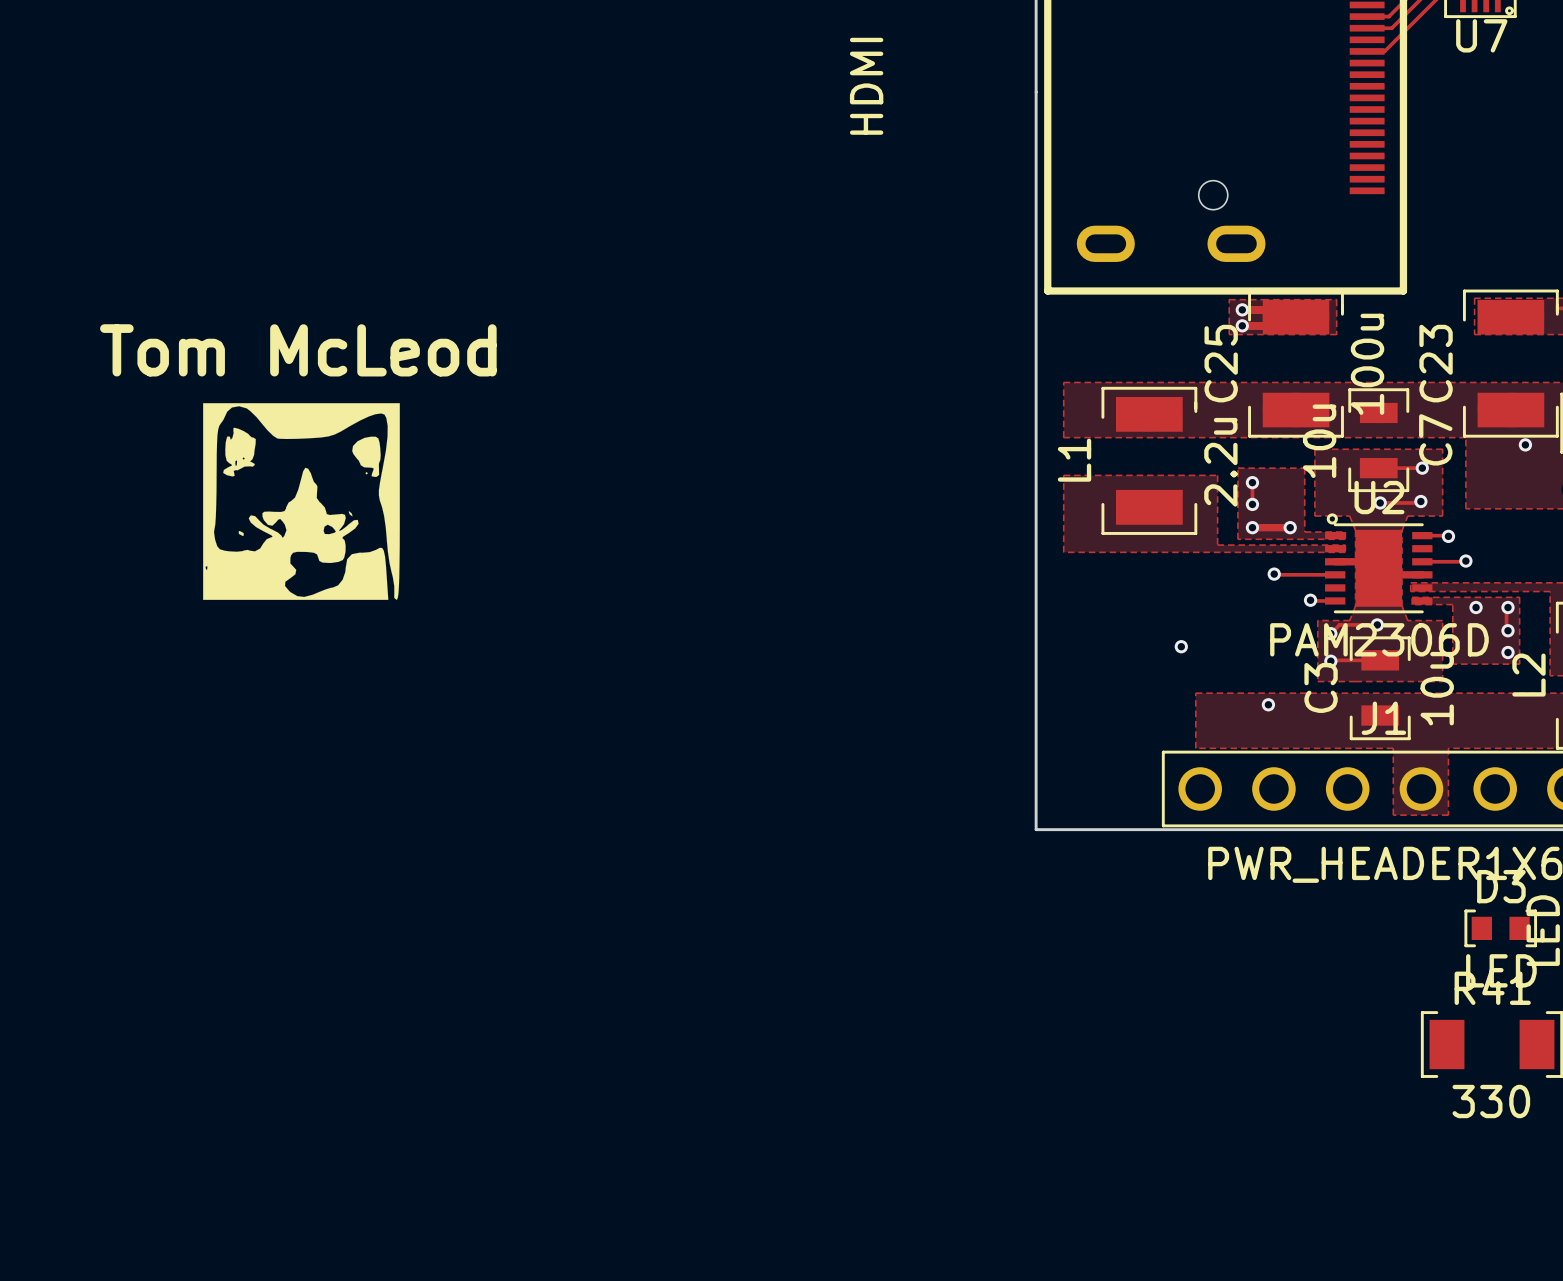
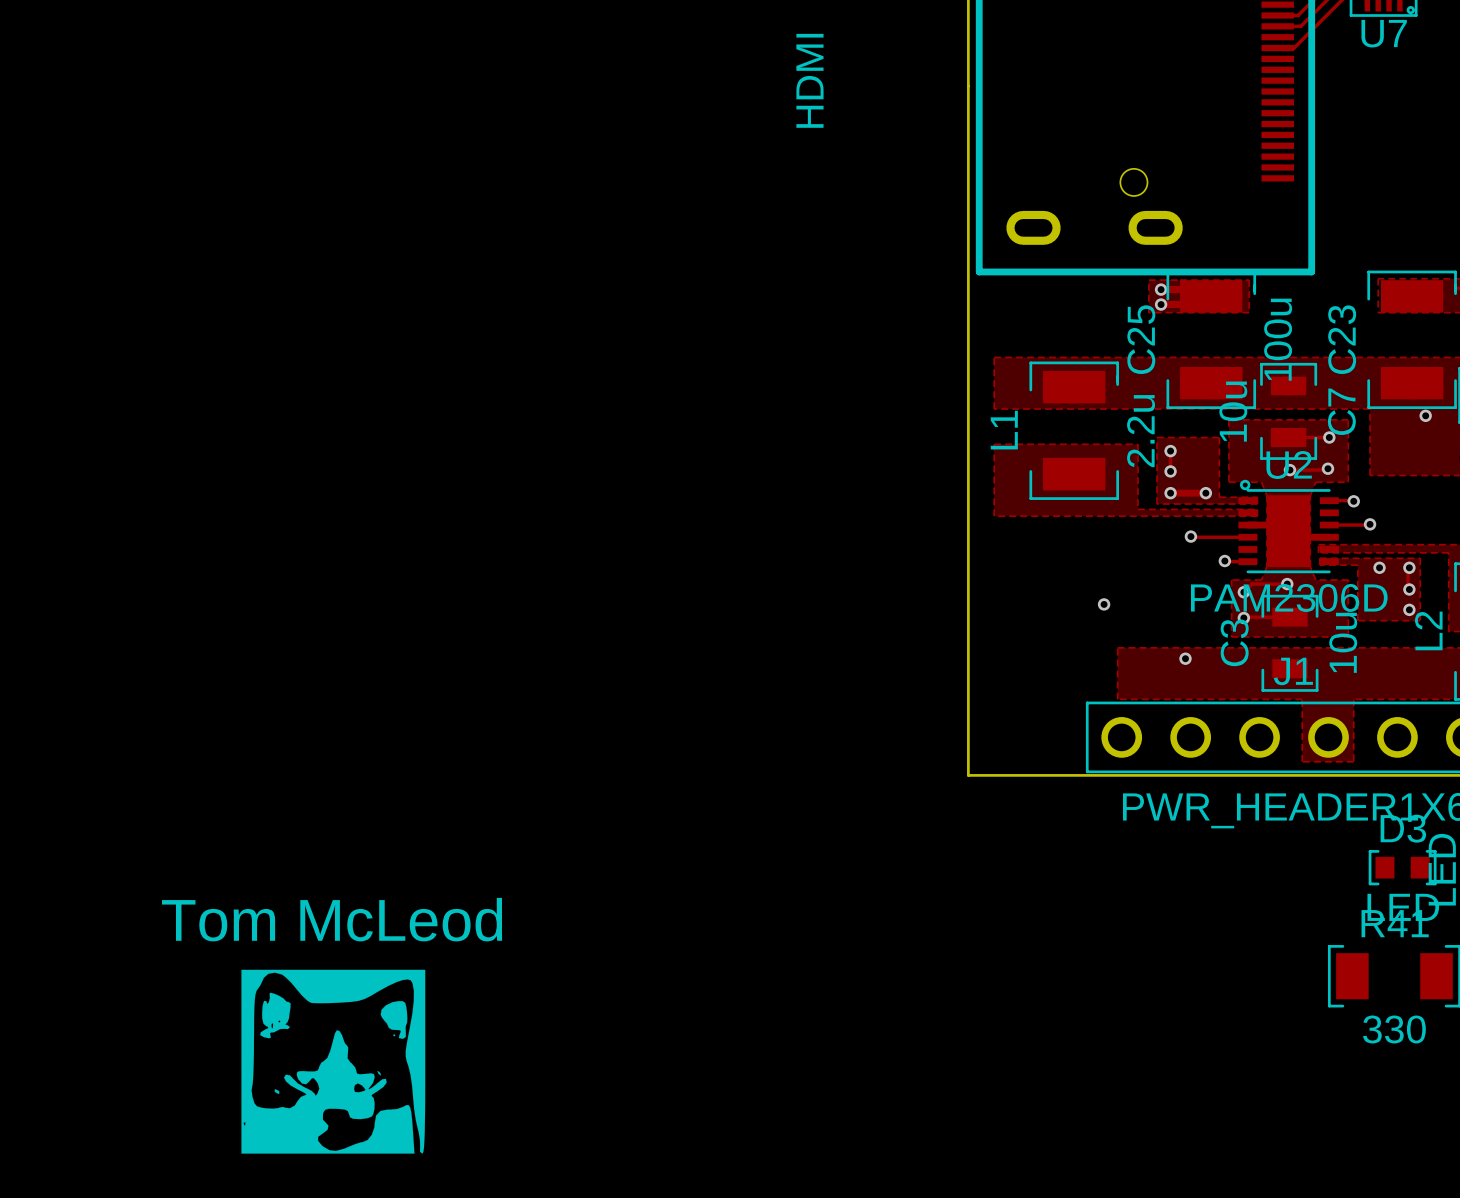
text position: Tom McLeod (298, 350) -> Tom McLeod (332, 919)
drawing position: (301, 501) -> (333, 1061)

